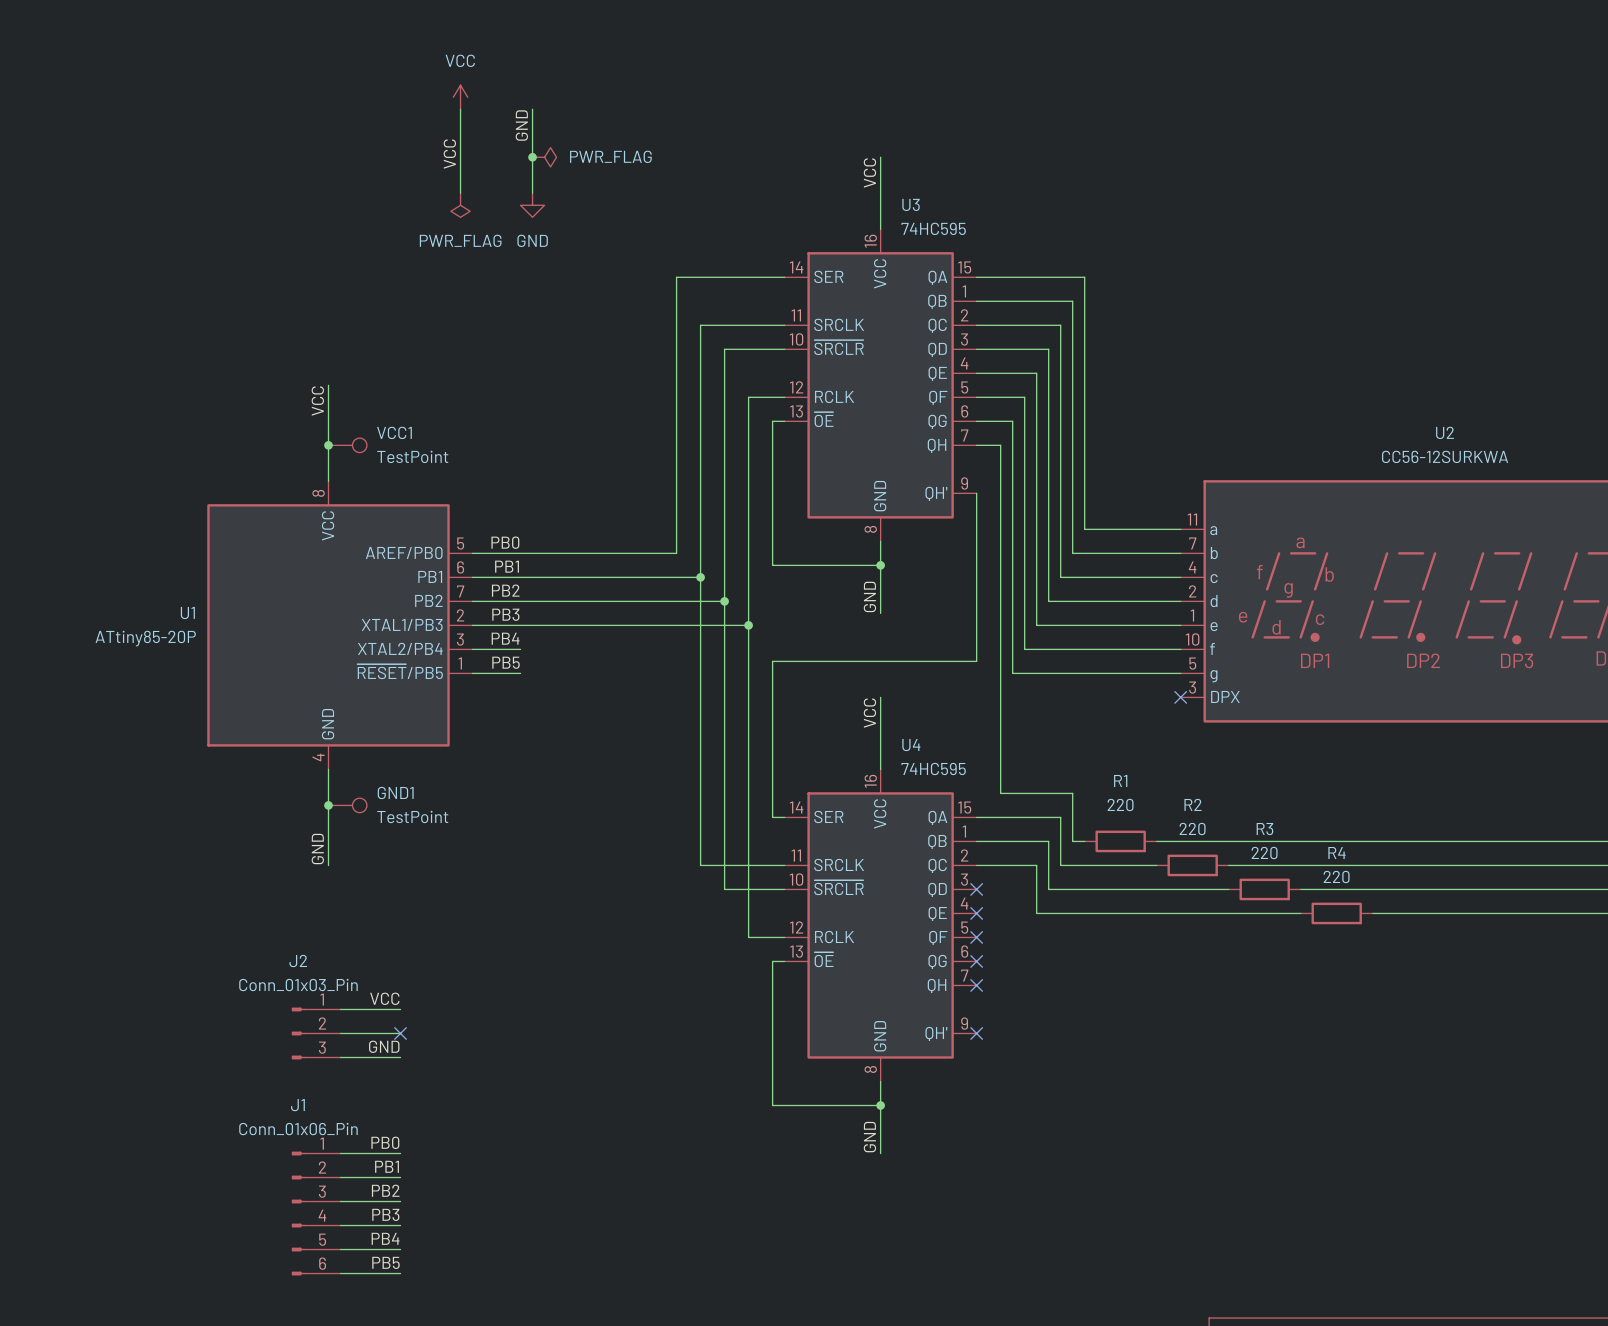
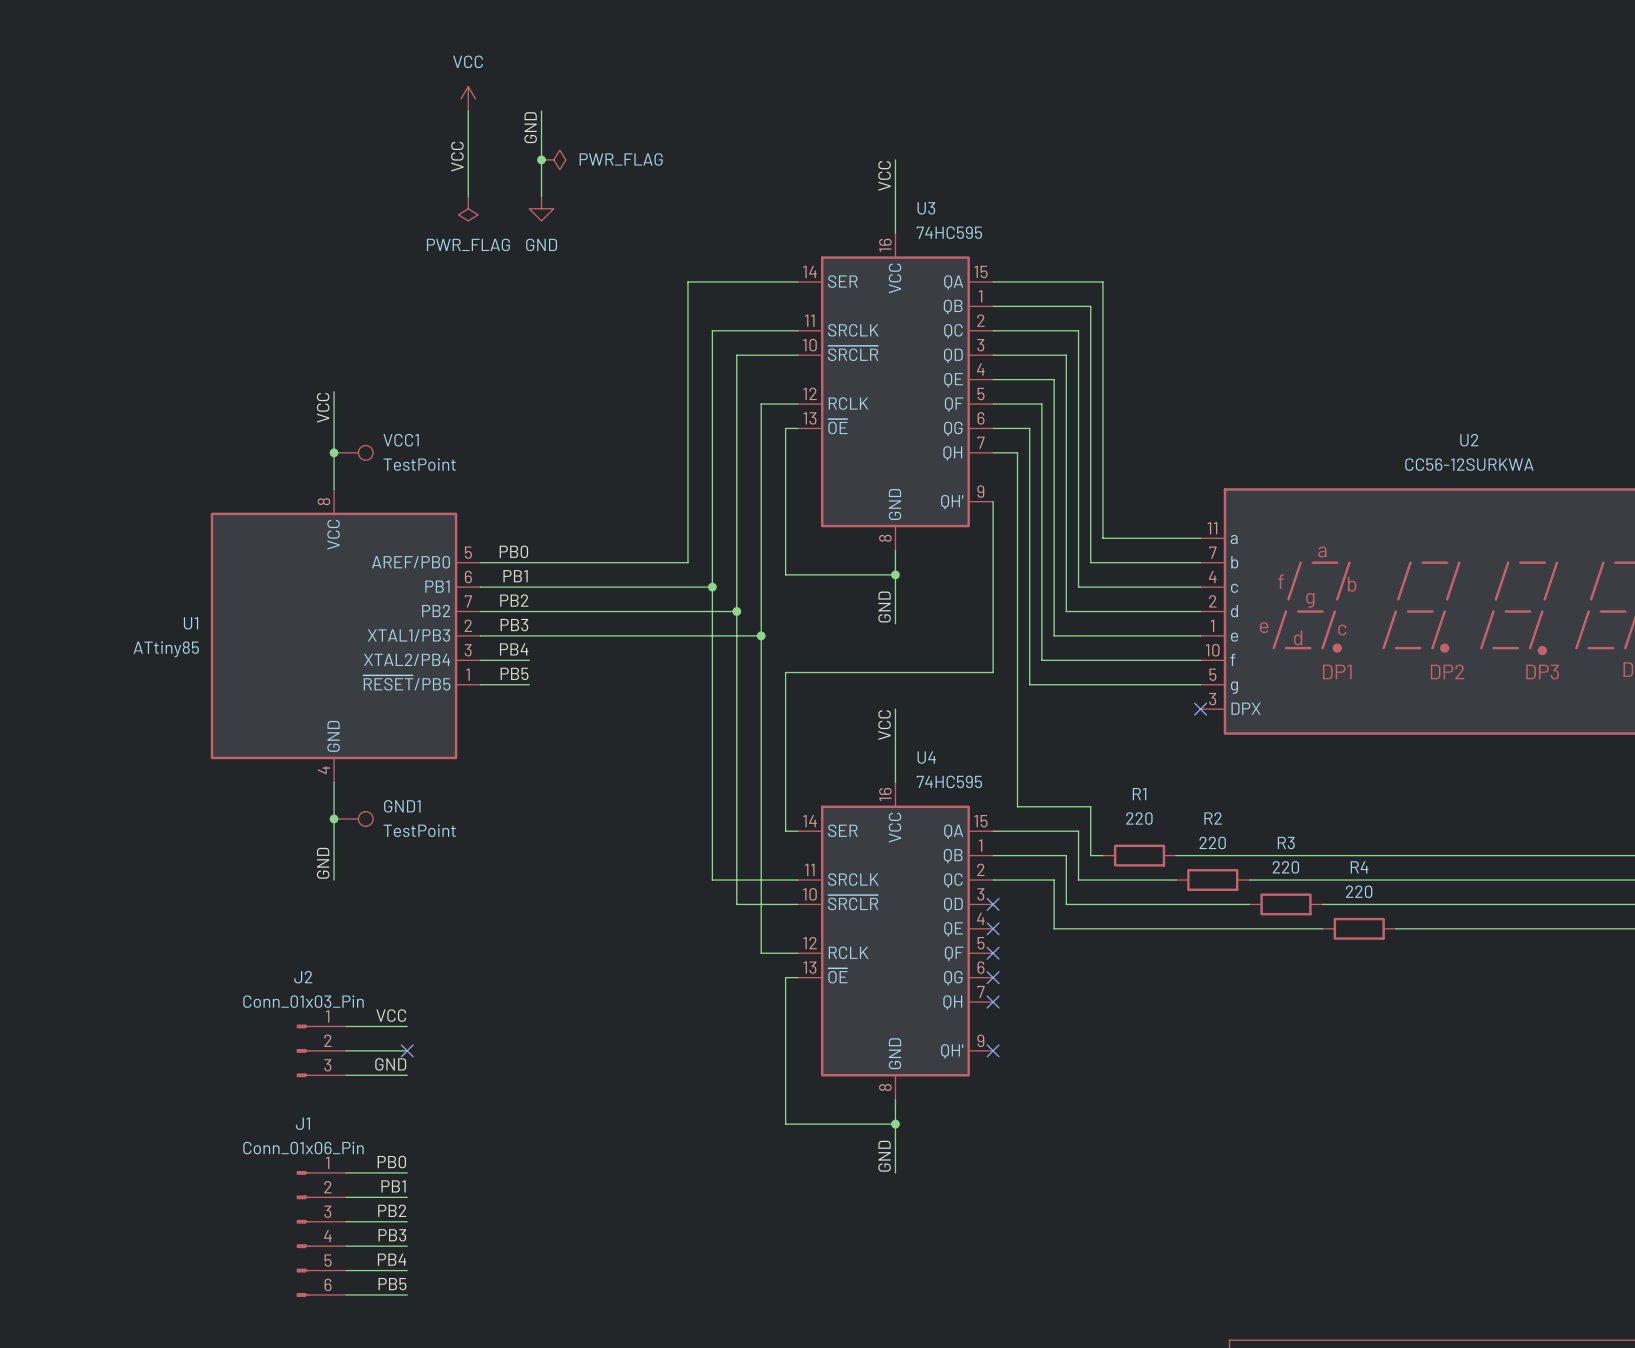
U1 value: ATtiny85-20P (145, 638) -> ATtiny85 (166, 649)

